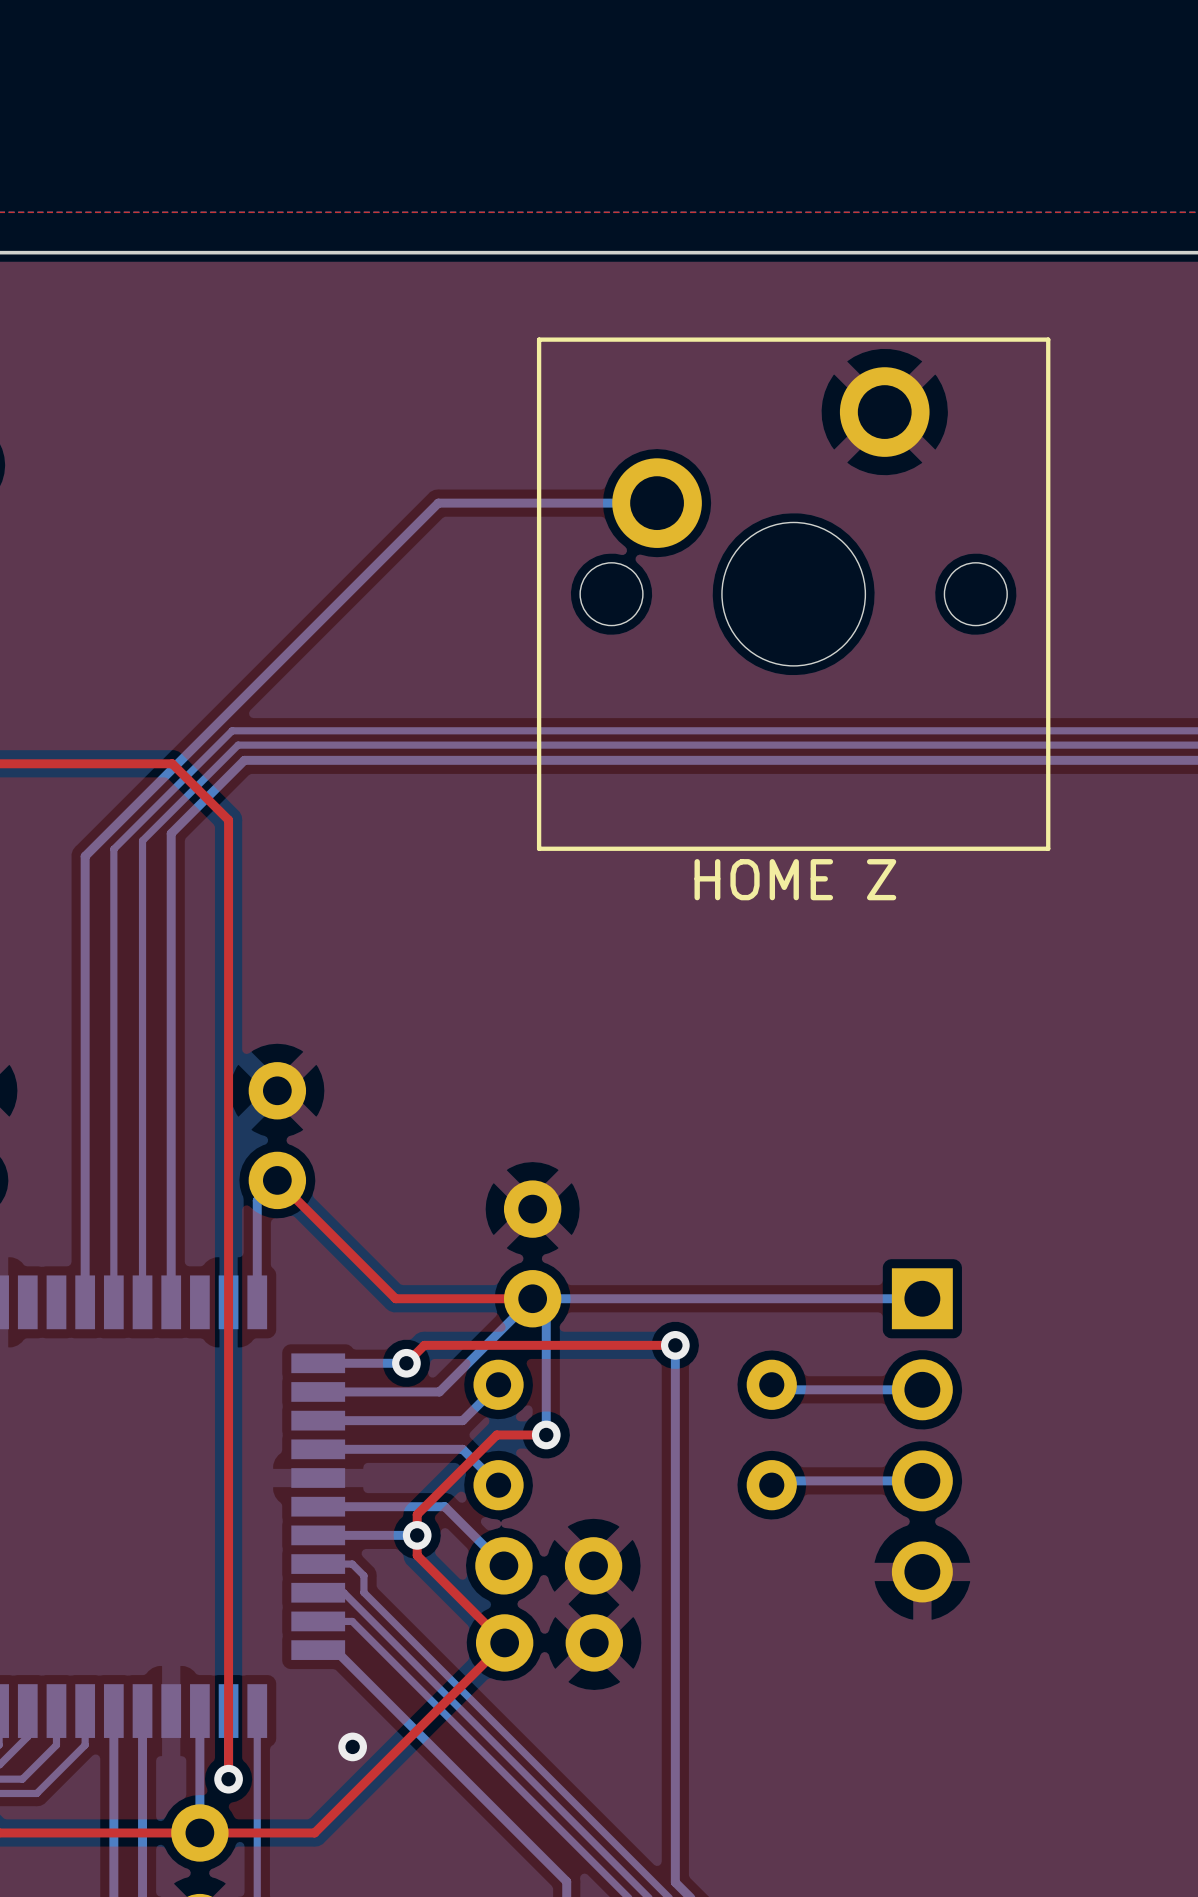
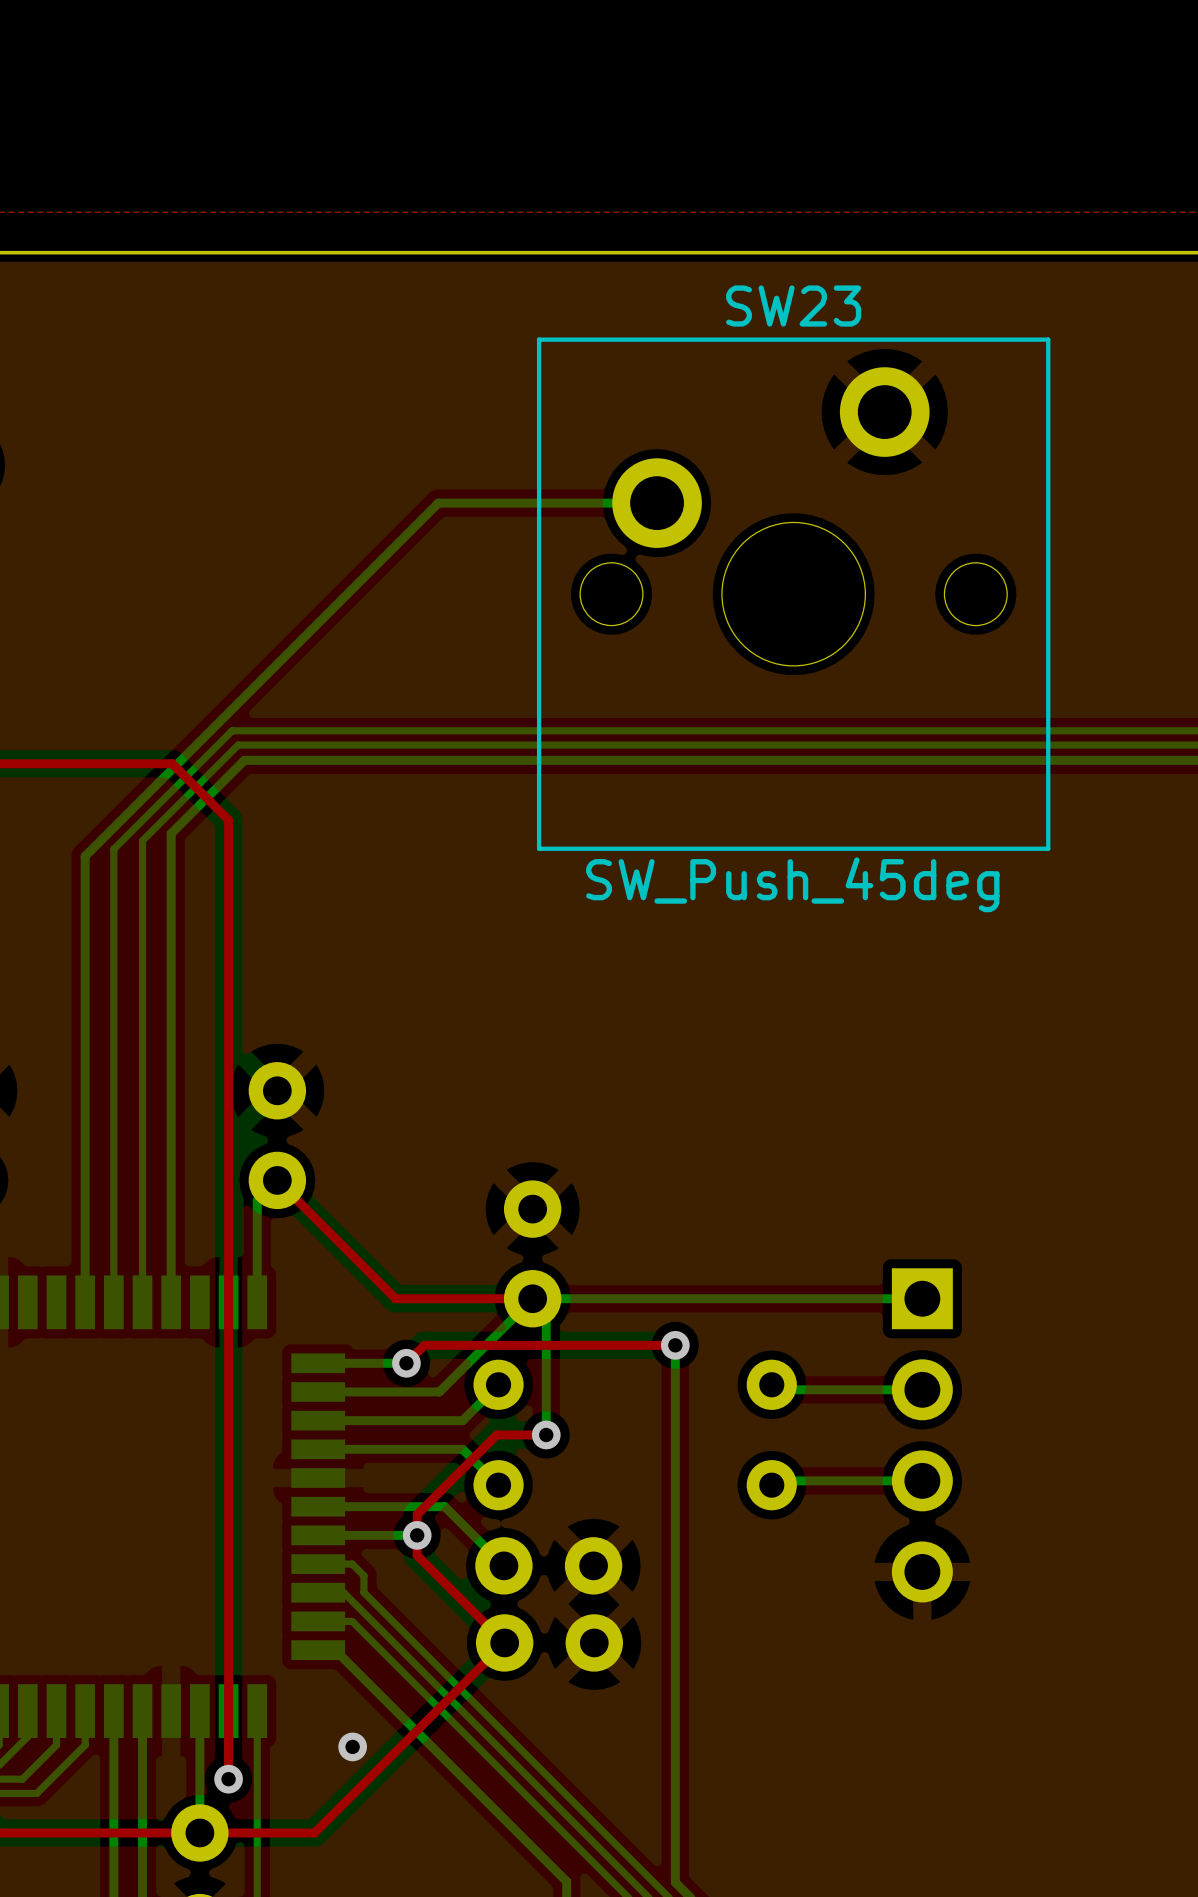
SW23 name: none -> SW23 (793, 306)
SW23 value: HOME Z (795, 879) -> SW_Push_45deg (792, 884)

